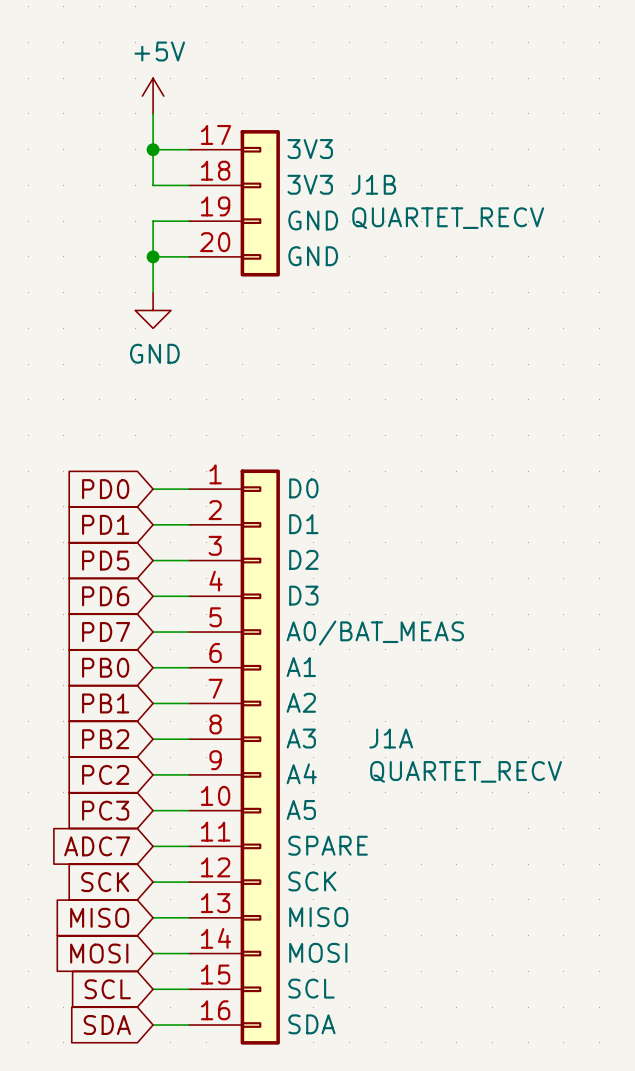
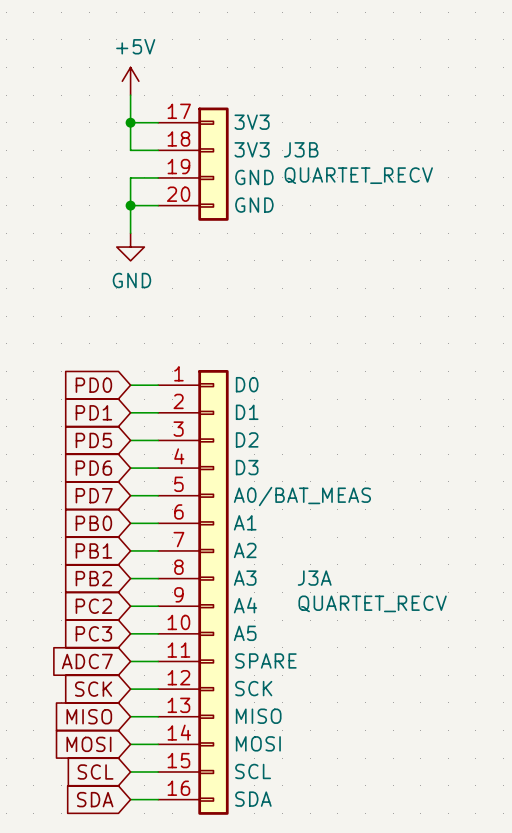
J1B name: J1B (373, 184) -> J3B (301, 149)
J1A name: J1A (391, 738) -> J3A (314, 578)

